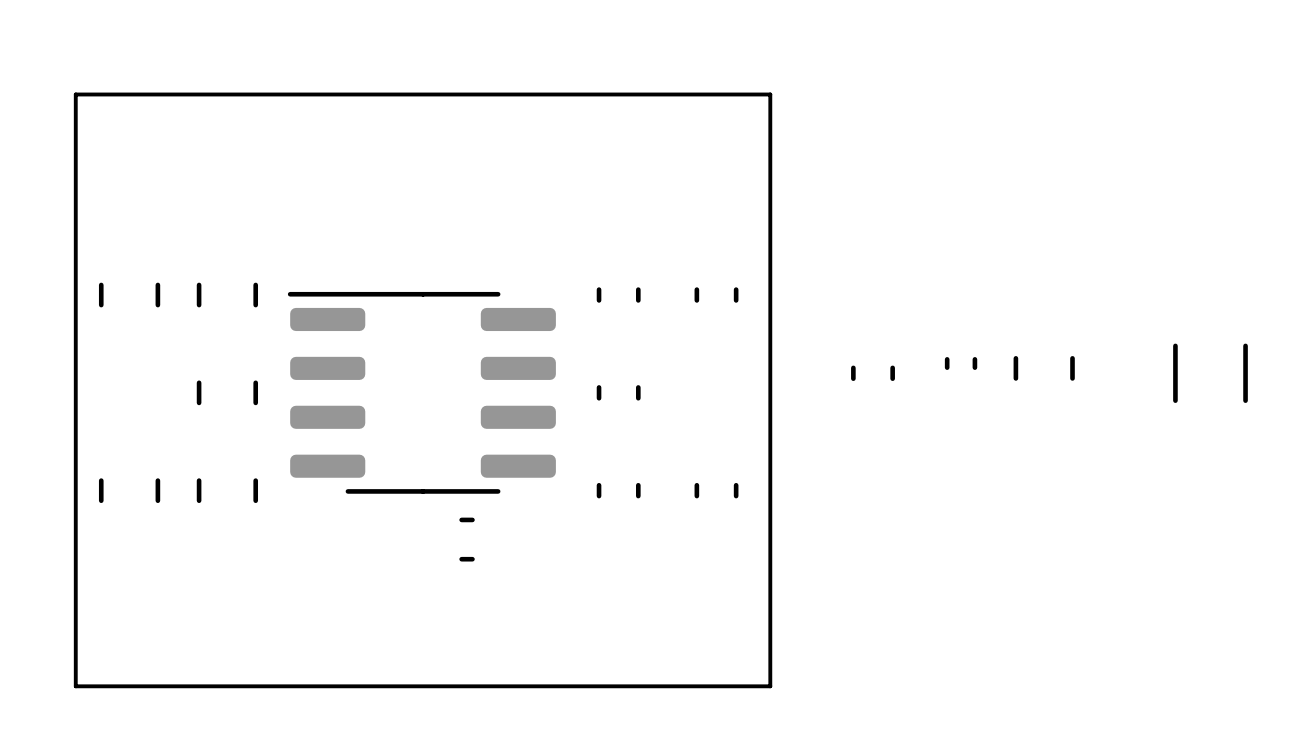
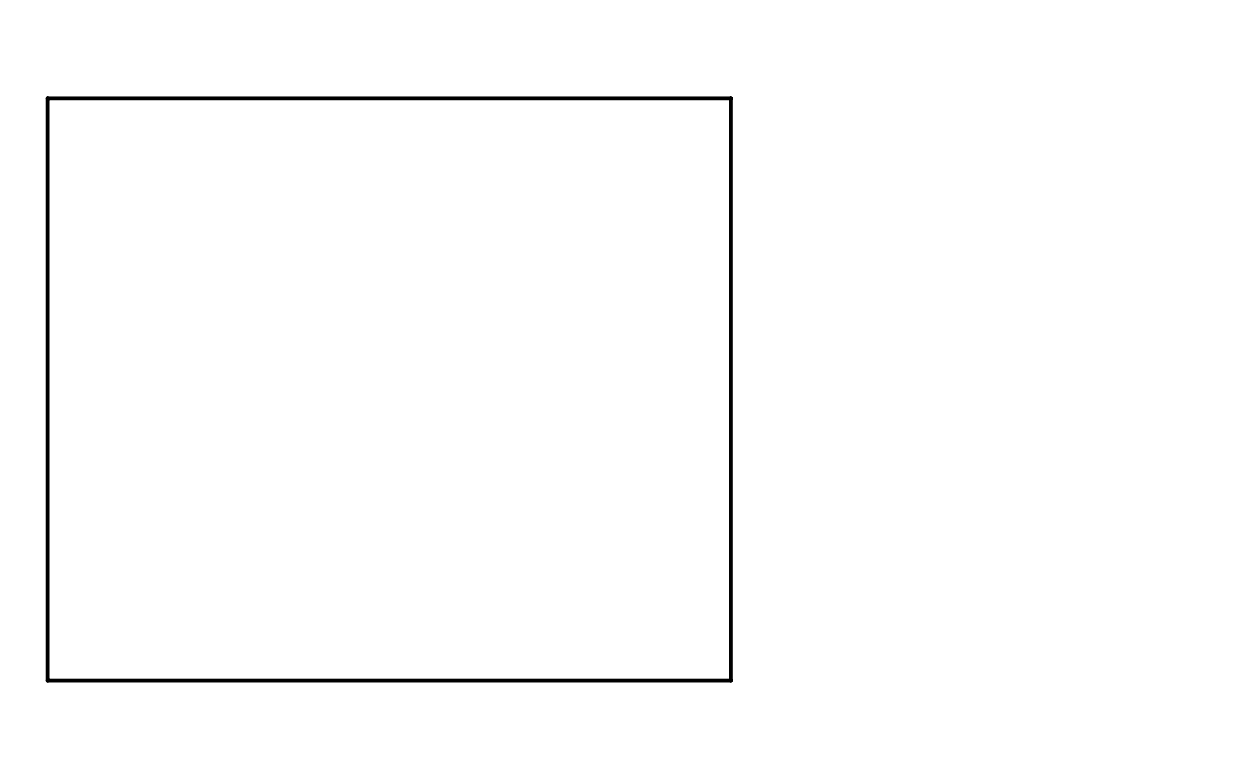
drawing: [98, 282, 259, 308] -> none
drawing: [596, 287, 641, 303] -> none
drawing: [694, 287, 739, 303] -> none
drawing: [1173, 343, 1248, 403] -> none
drawing: [944, 356, 1075, 381] -> none
drawing: [851, 365, 895, 382] -> none
drawing: [196, 380, 259, 406] -> none
drawing: [596, 385, 641, 401] -> none
part: (421, 392) -> none
drawing: [98, 478, 259, 504] -> none
drawing: [596, 482, 641, 499] -> none
drawing: [694, 482, 739, 499] -> none
drawing: [459, 517, 475, 562] -> none

